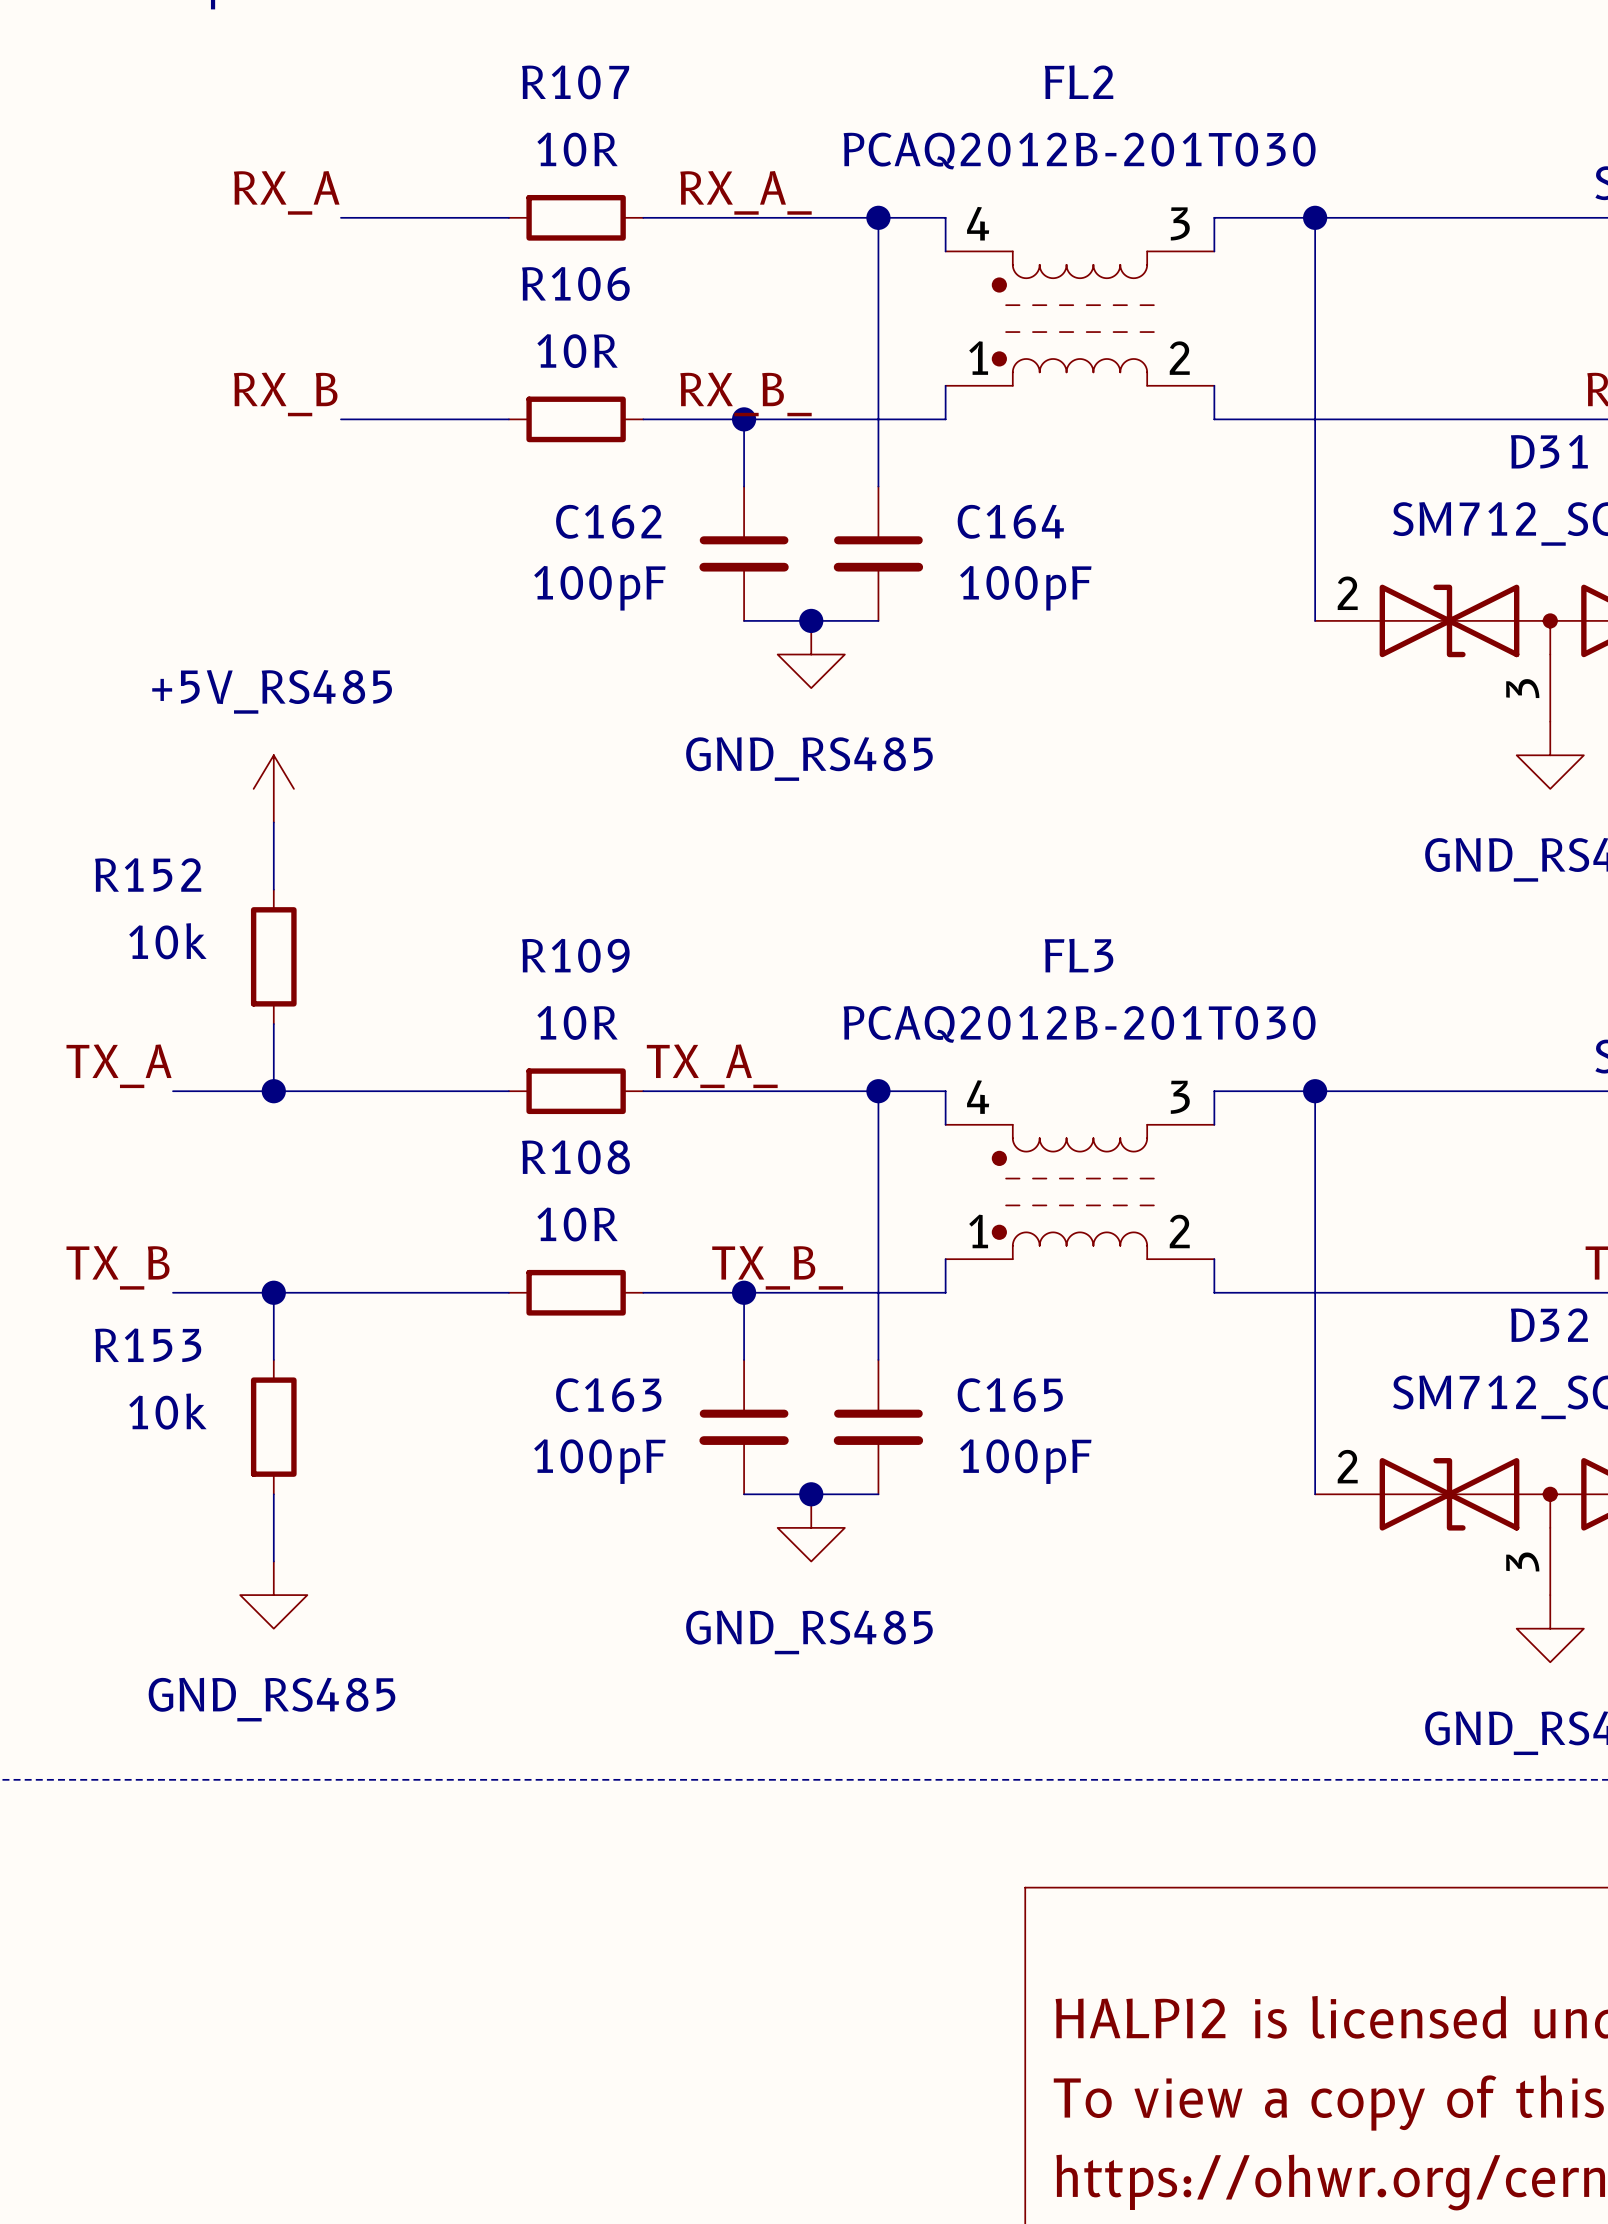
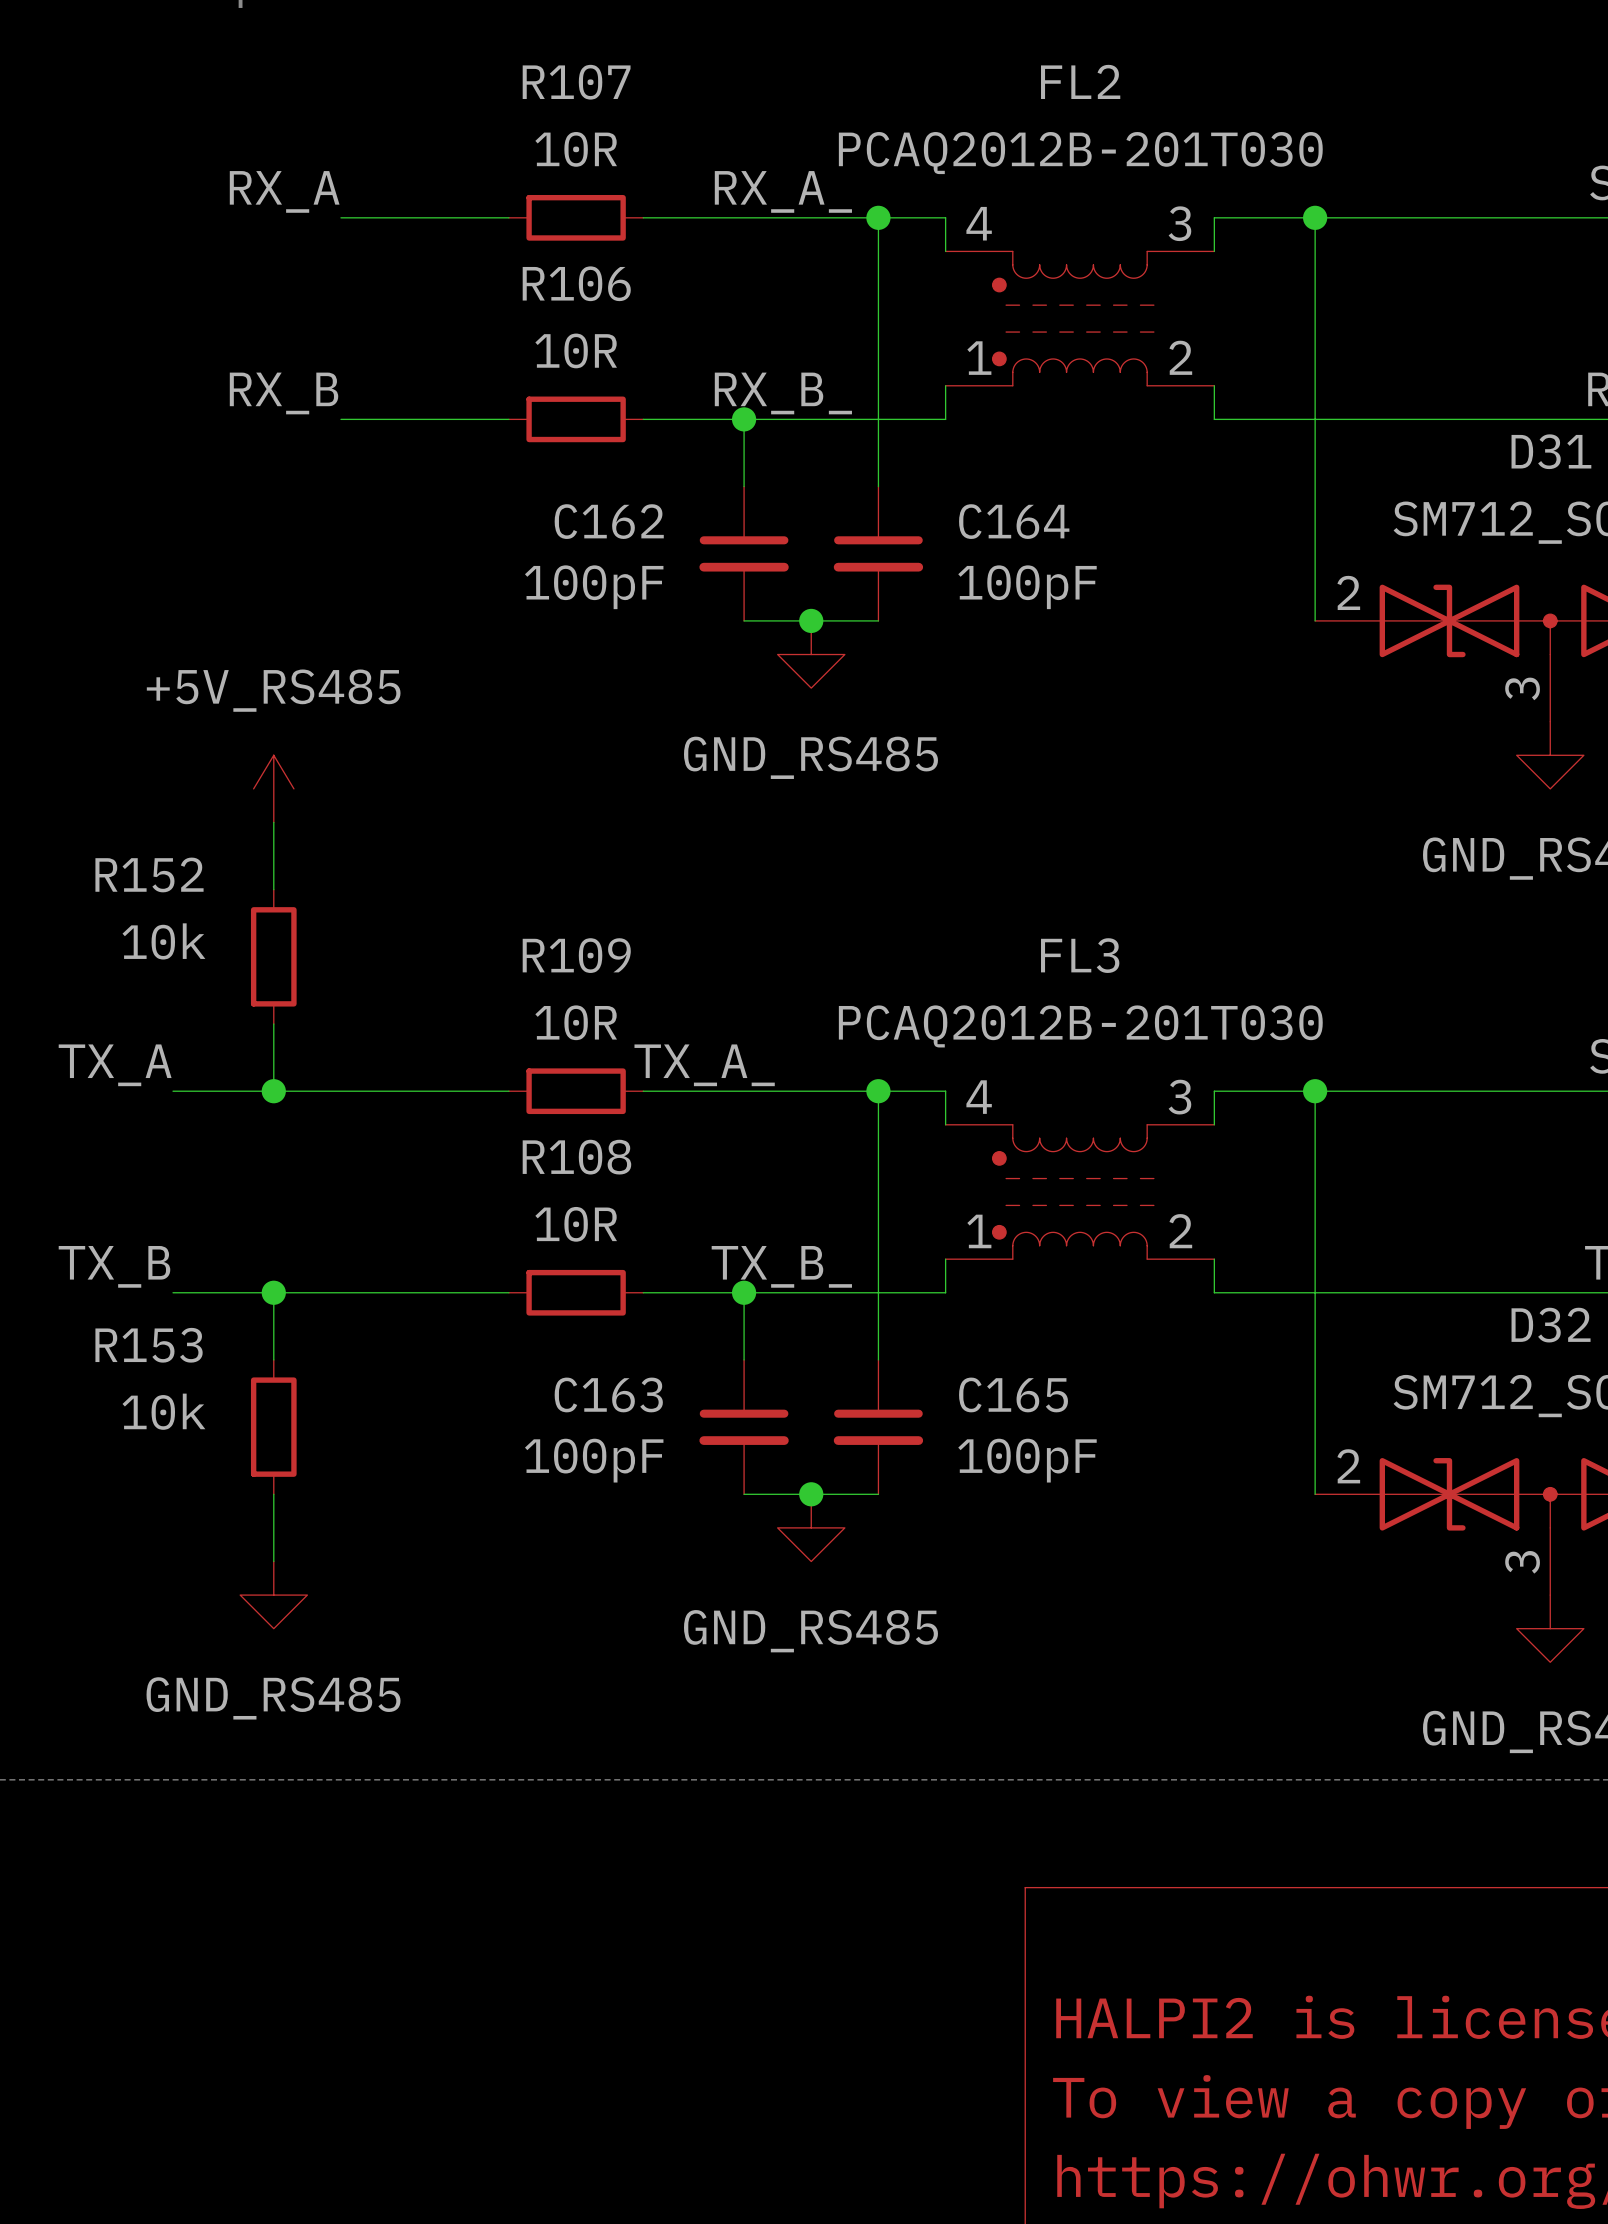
label position: RX_A_ (746, 192) -> RX_A_ (783, 191)
label position: RX_B_ (746, 394) -> RX_B_ (783, 393)

